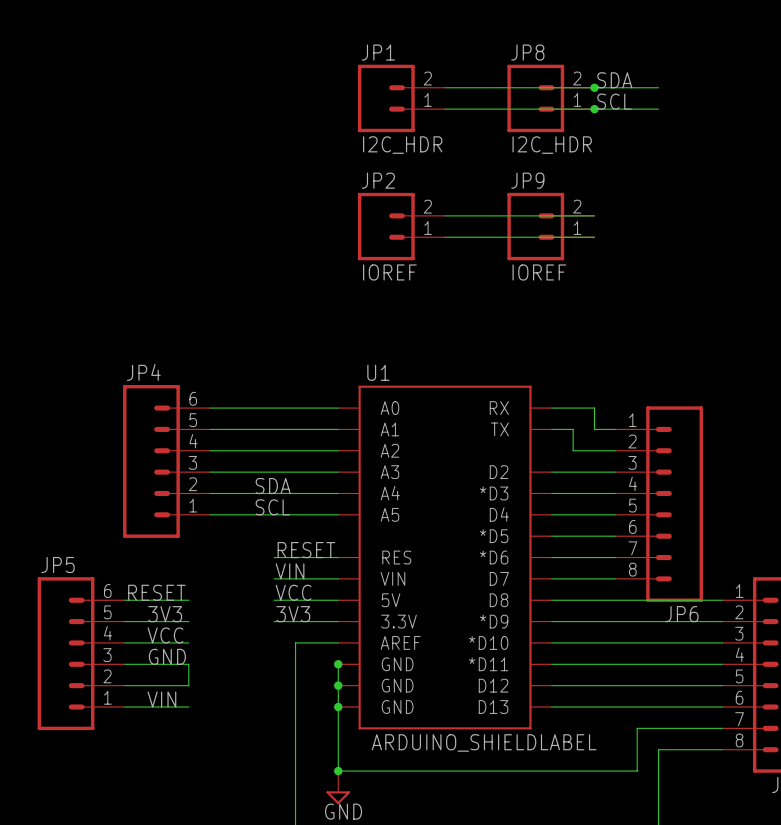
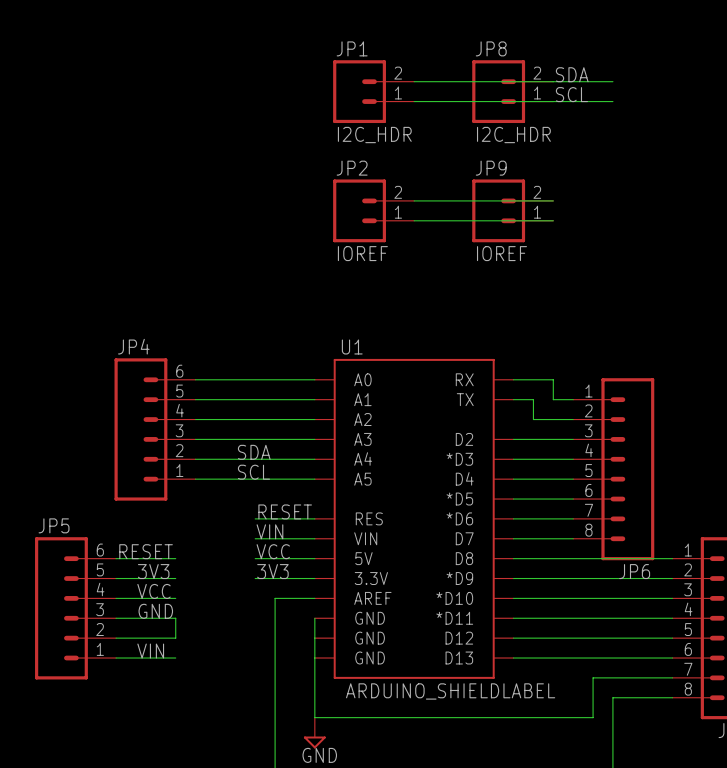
junction: (594, 87) -> none
junction: (594, 109) -> none
junction: (338, 664) -> none
junction: (338, 685) -> none
junction: (338, 707) -> none
junction: (338, 771) -> none

